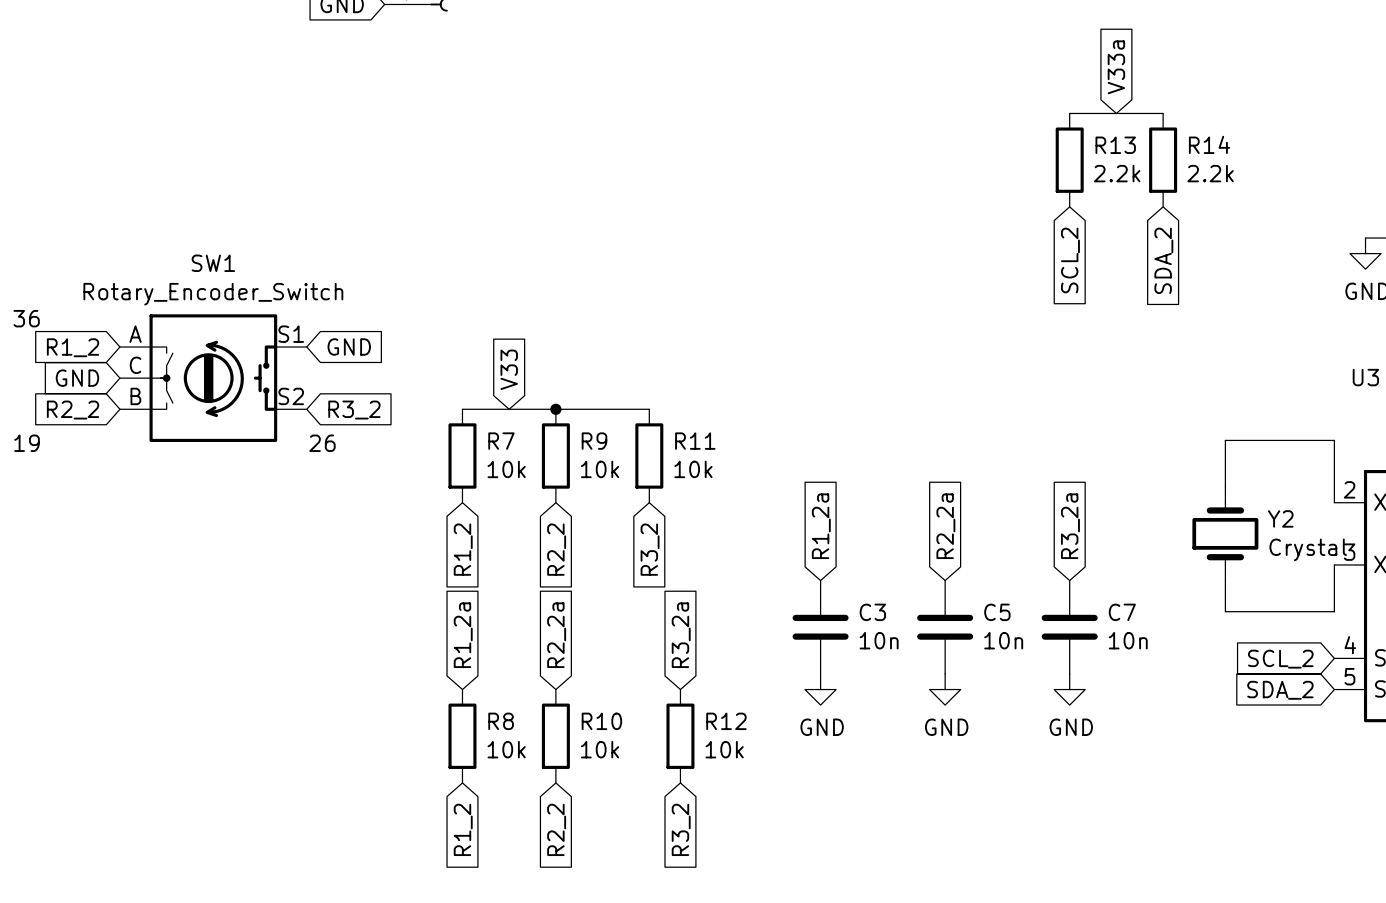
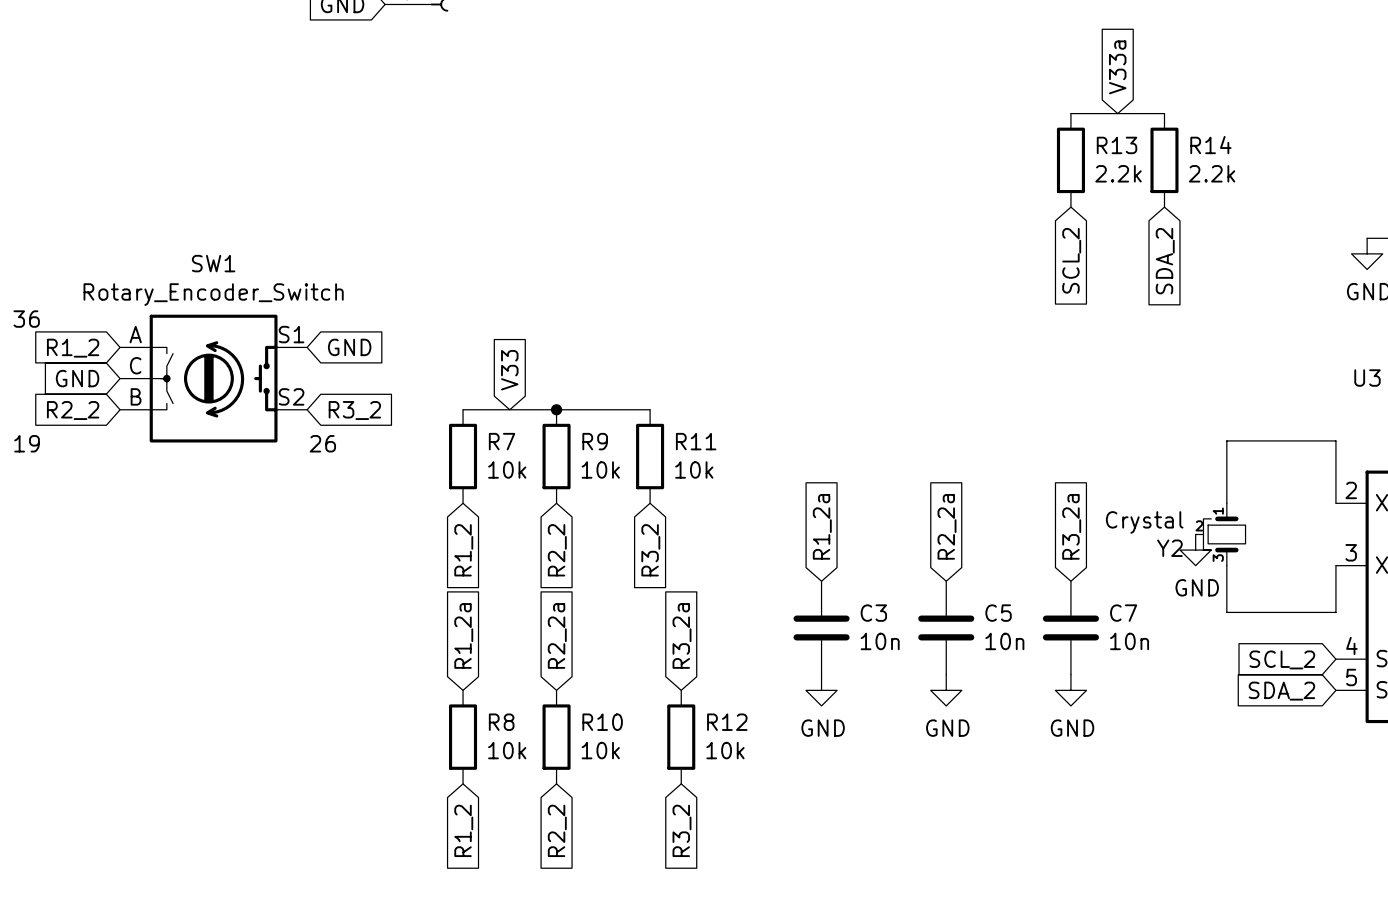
Y2 symbol: [1192, 487, 1259, 581] -> [1195, 503, 1246, 566]
Y2 name position: Y2 (1280, 518) -> Y2 (1169, 548)
power symbol: none -> GND (1195, 550)
Y2 value position: Crystal (1308, 549) -> Crystal (1144, 522)

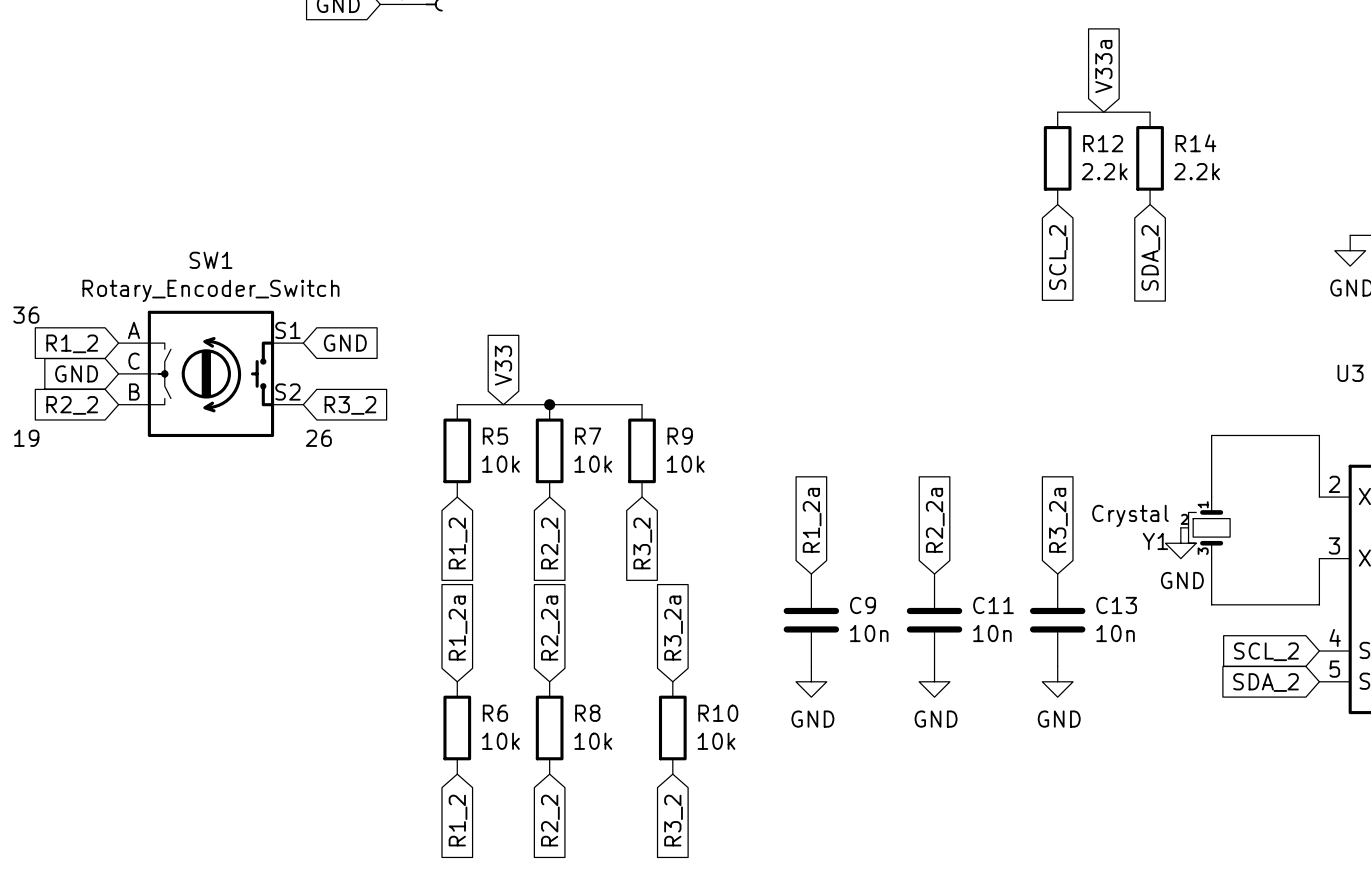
R13 name: R13 (1117, 145) -> R12 (1103, 143)
R7 name: R7 (502, 441) -> R5 (495, 436)
R9 name: R9 (595, 441) -> R7 (588, 436)
R11 name: R11 (696, 441) -> R9 (680, 436)
Y2 name: Y2 (1169, 548) -> Y1 (1155, 541)
C3 name: C3 (873, 613) -> C9 (863, 605)
C5 name: C5 (998, 613) -> C11 (993, 605)
C7 name: C7 (1123, 613) -> C13 (1116, 605)
R8 name: R8 (501, 722) -> R6 (495, 713)
R10 name: R10 (602, 722) -> R8 (587, 713)
R12 name: R12 (727, 722) -> R10 (718, 713)

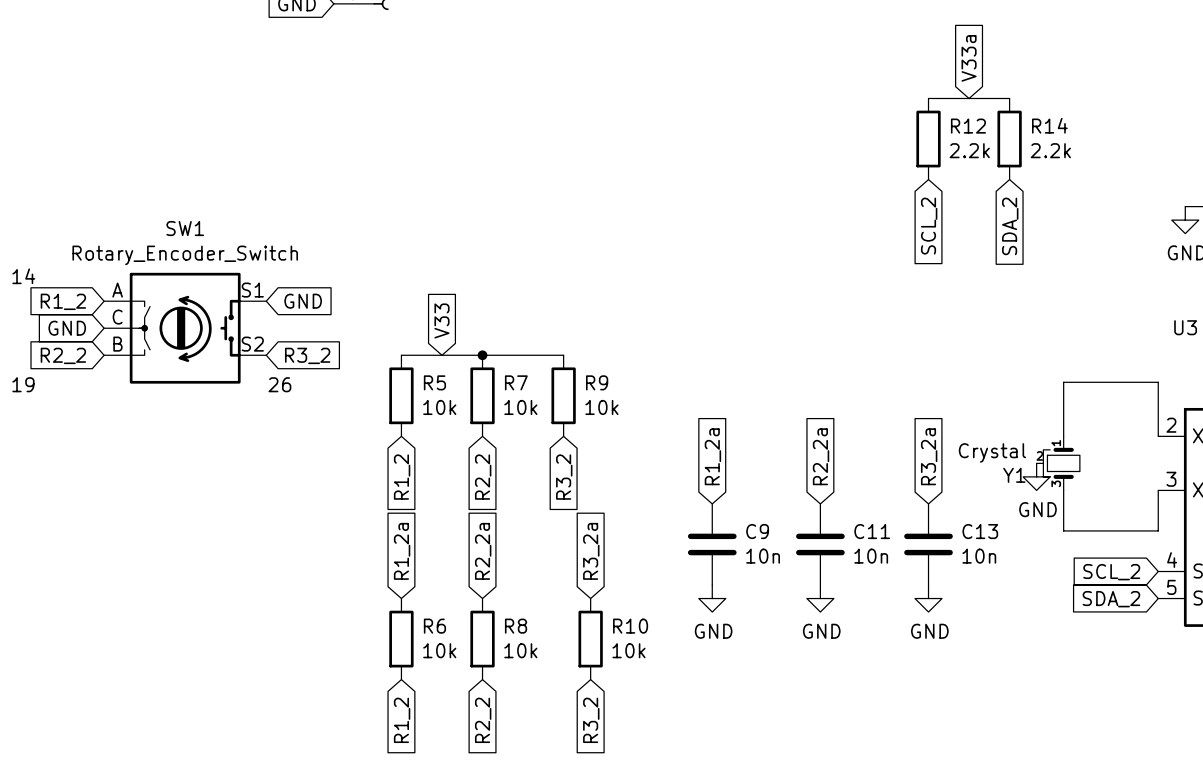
text: 36 (26, 315) -> 14 (23, 276)

